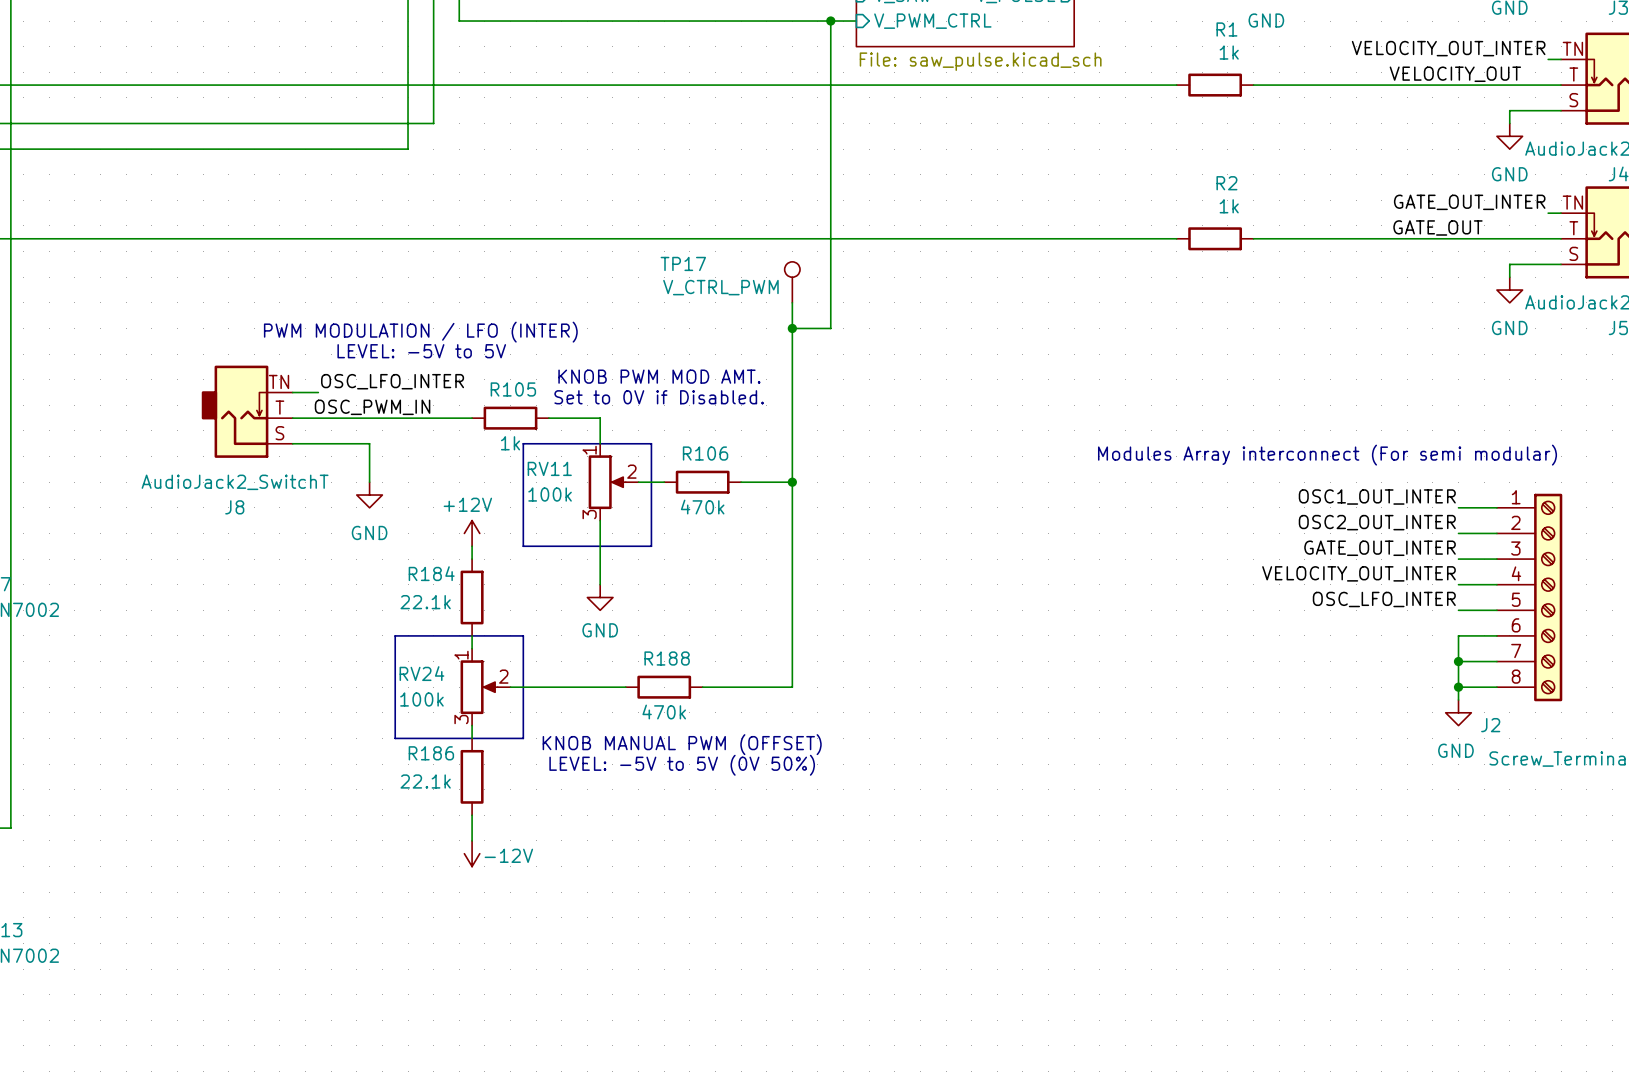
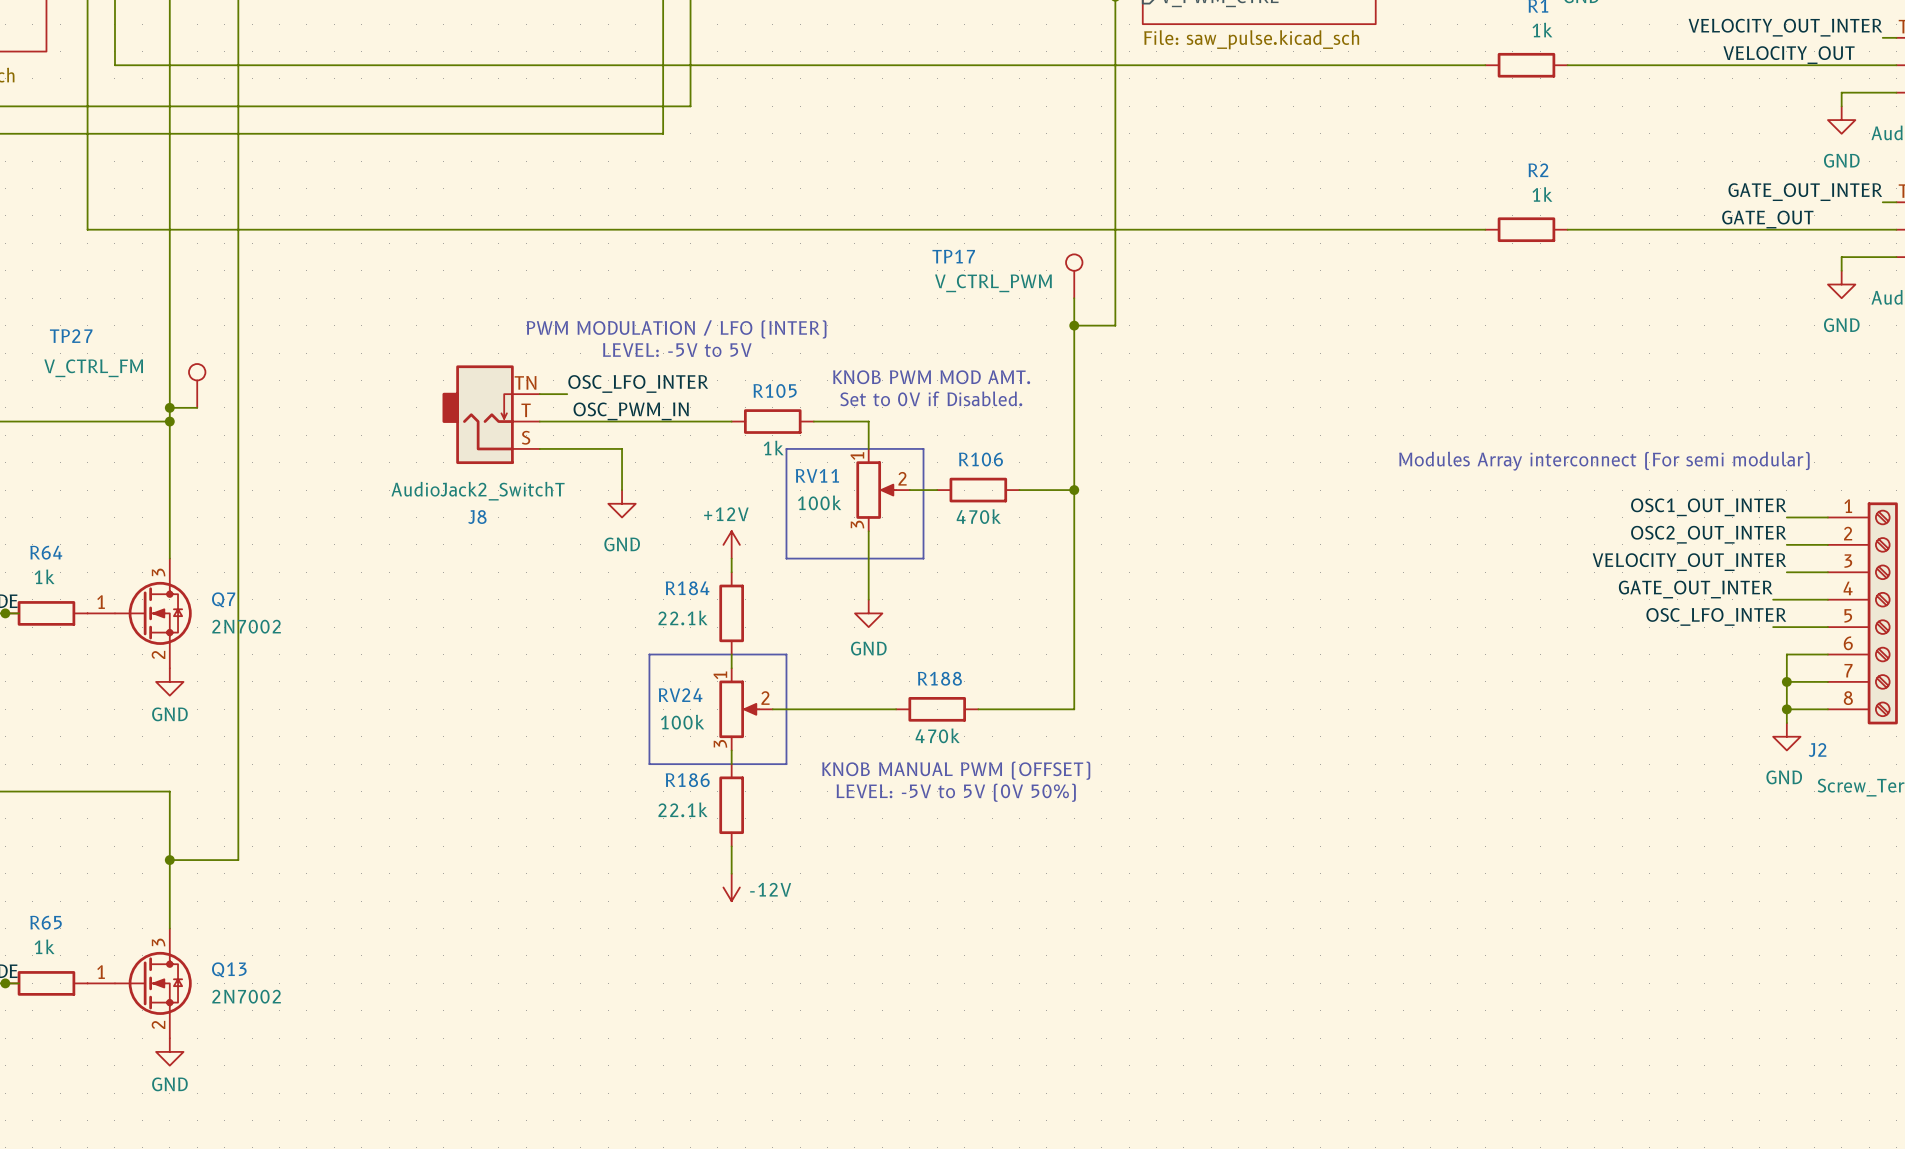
label: GATE_OUT_INTER (1380, 548) -> VELOCITY_OUT_INTER (1689, 562)
label: VELOCITY_OUT_INTER (1358, 573) -> GATE_OUT_INTER (1695, 589)
wire: none -> (1773, 599) (1786, 599)
wire: none -> (1773, 627) (1786, 627)

